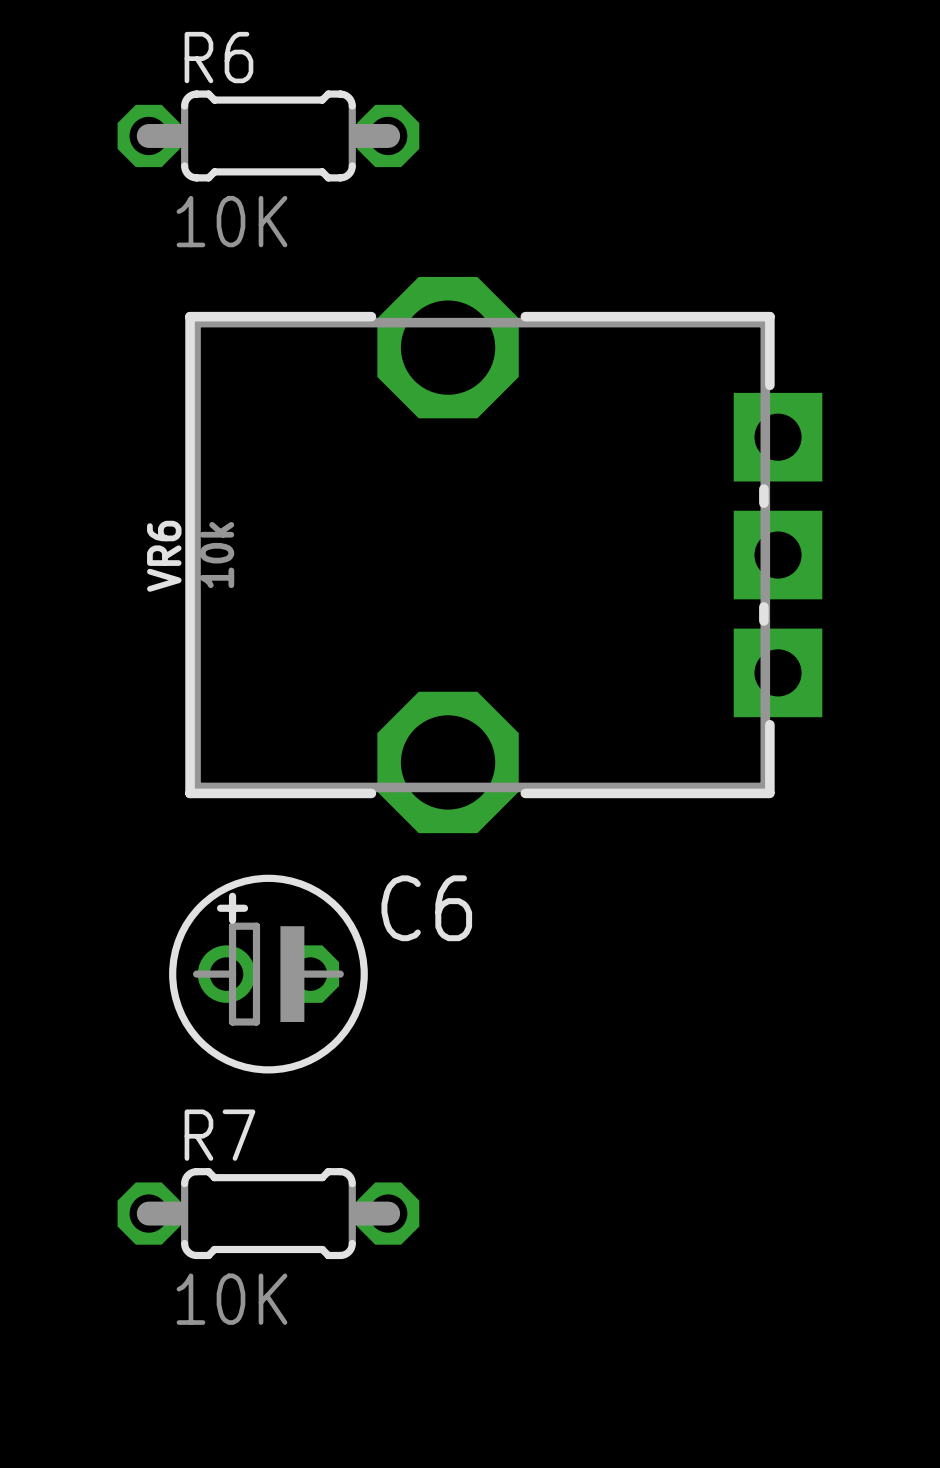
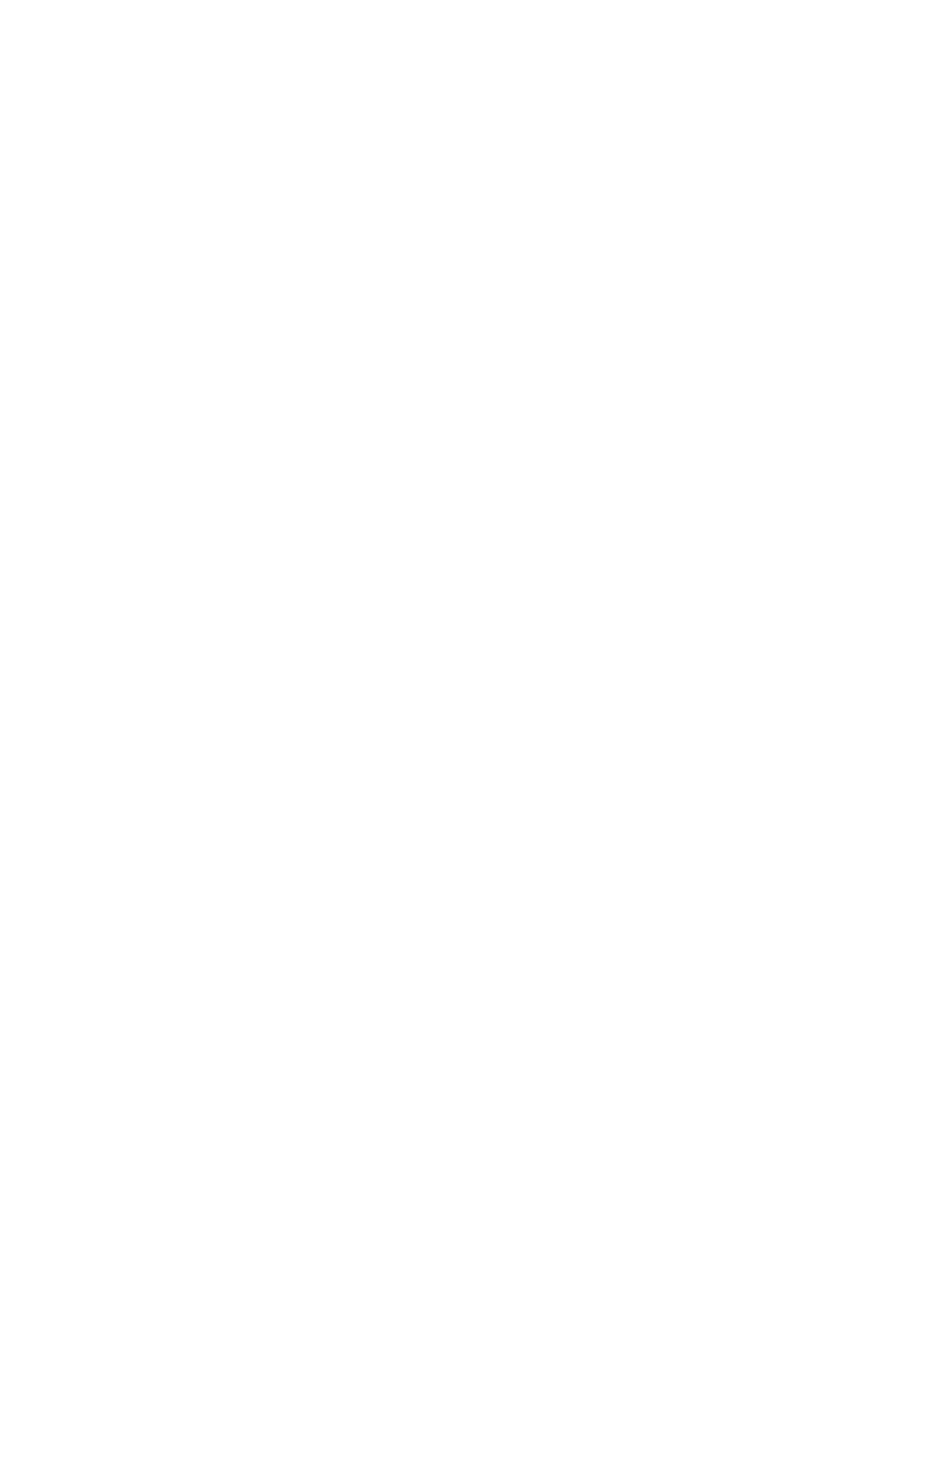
R6: 10K (268, 135) -> none
VR6: 10k (503, 555) -> none
C6: (268, 974) -> none
R7: 10K (268, 1213) -> none

